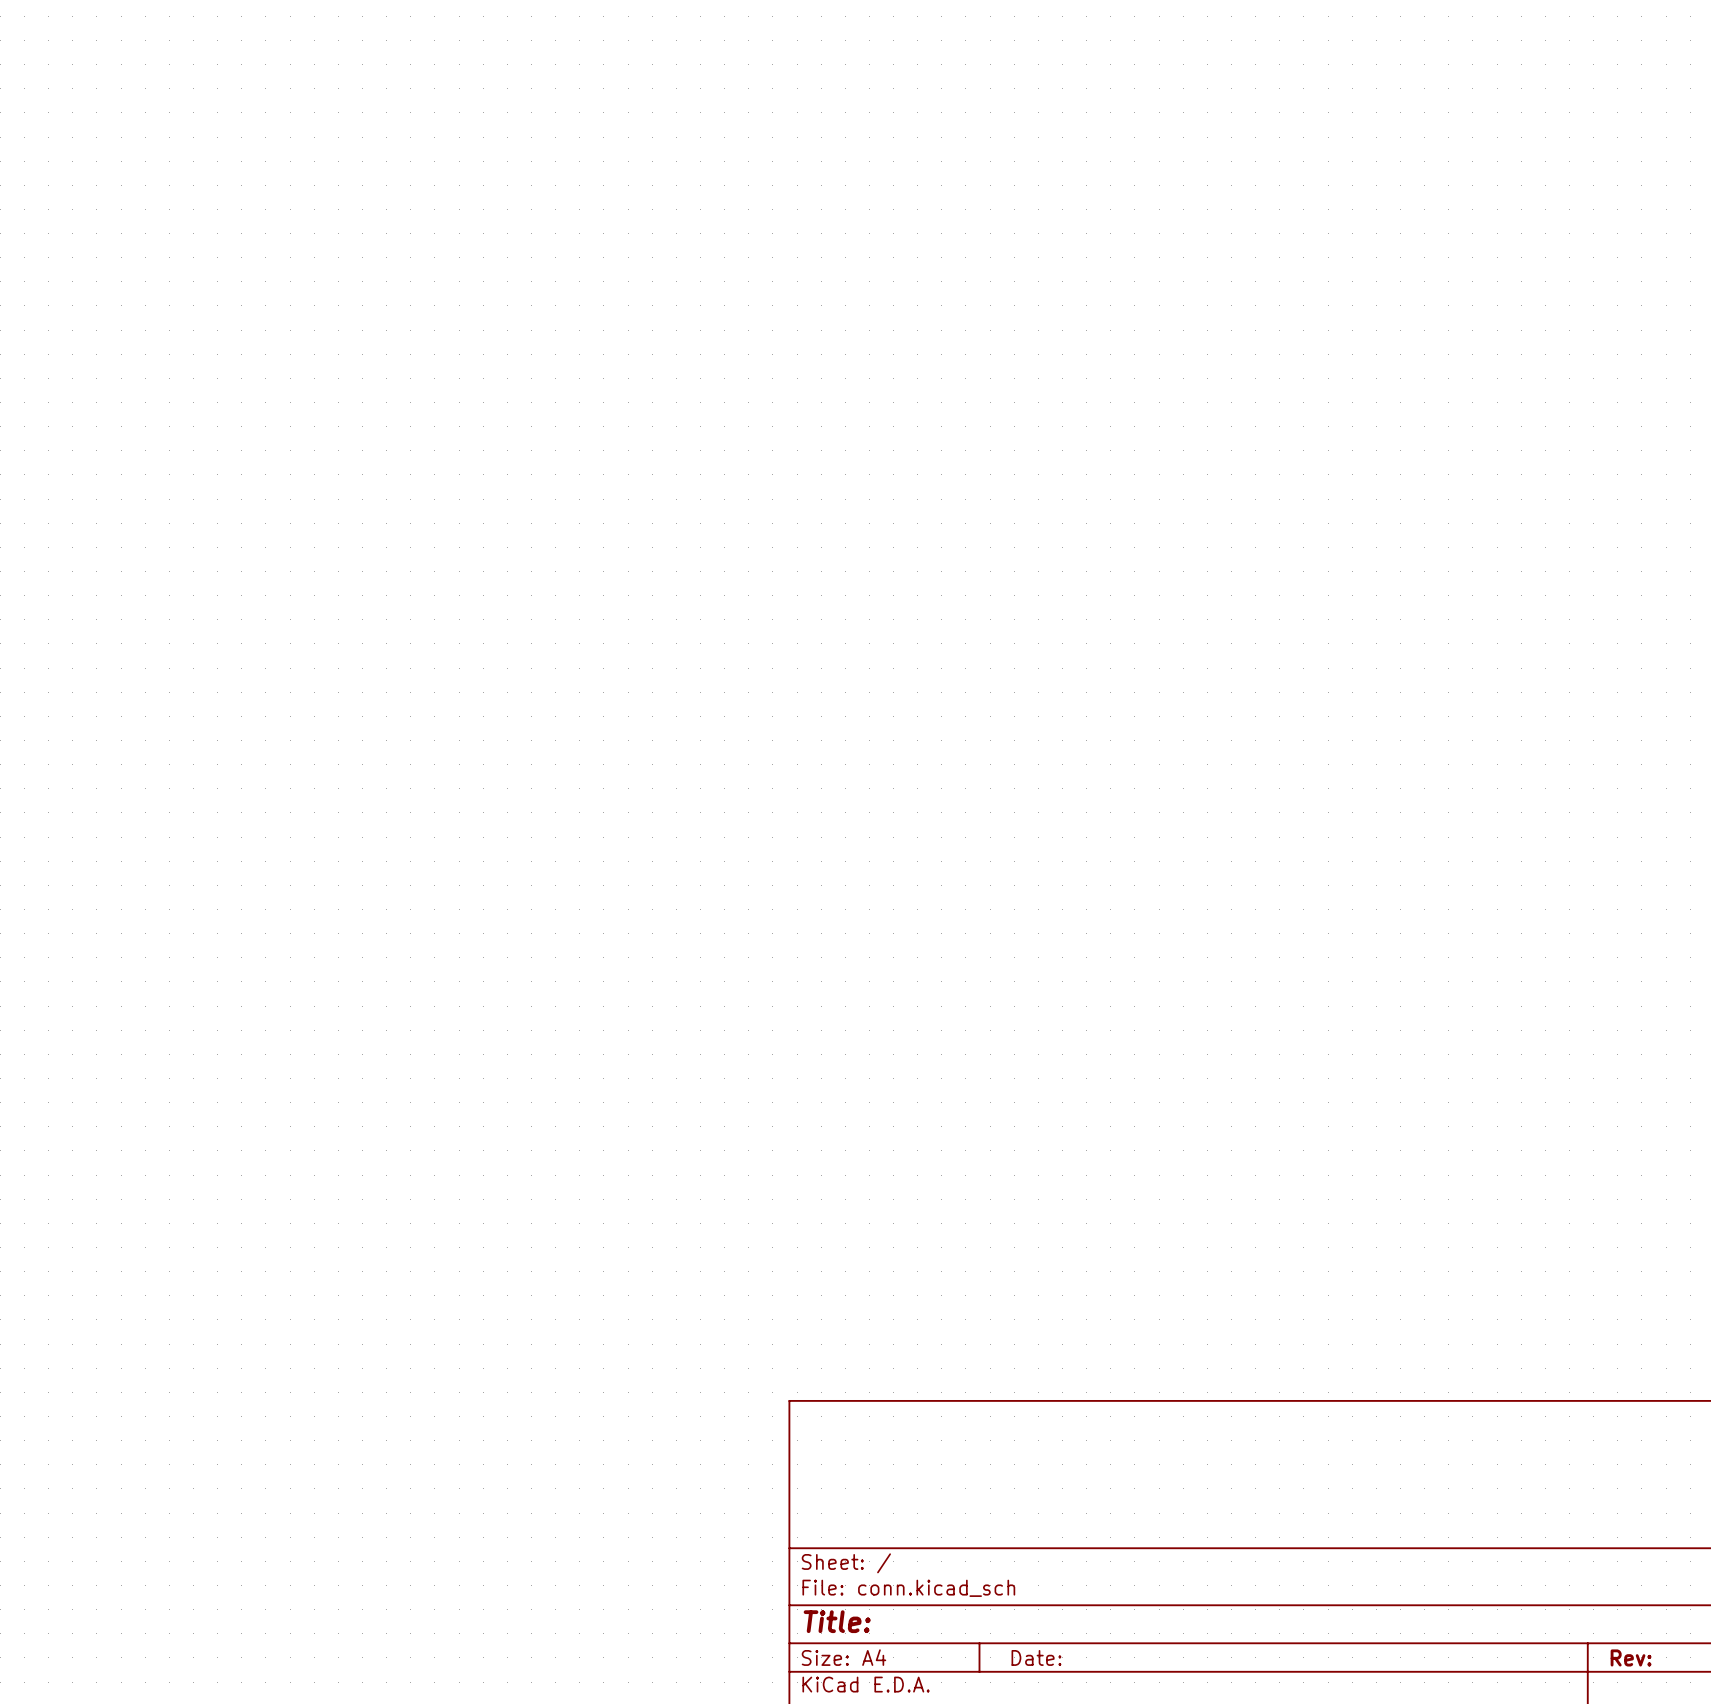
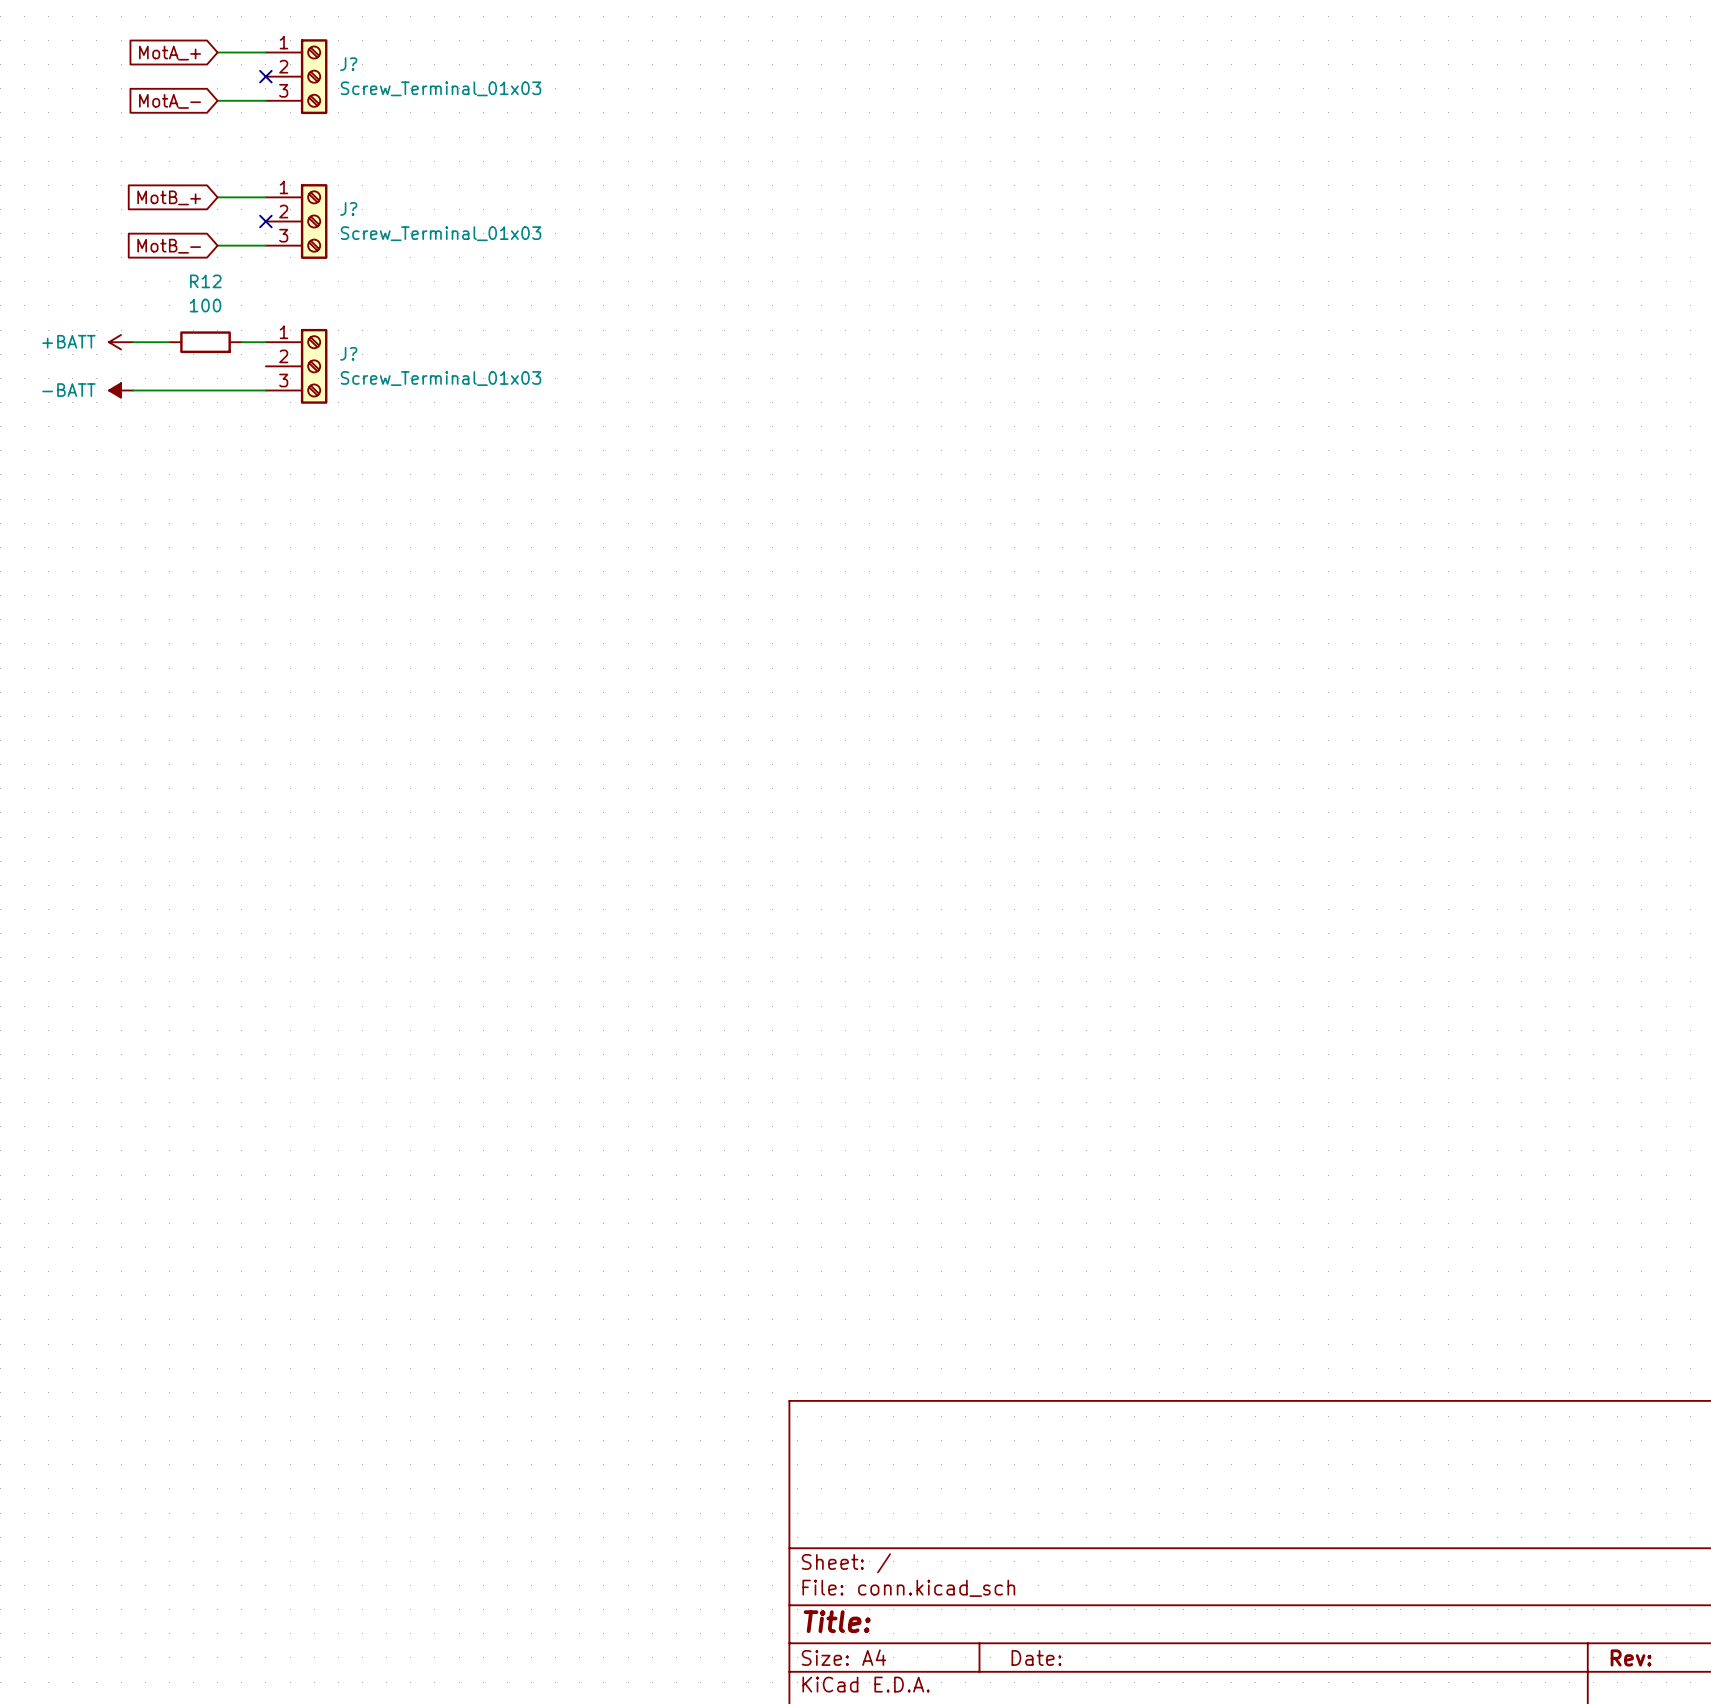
wire: none -> (217, 52) (265, 52)
global label: none -> MotA_+ (170, 53)
no-connect mark: none -> (265, 76)
J?: none -> Screw_Terminal_01x03 (296, 76)
wire: none -> (217, 100) (265, 100)
global label: none -> MotA_- (170, 101)
global label: none -> MotB_+ (169, 197)
wire: none -> (217, 197) (265, 197)
no-connect mark: none -> (265, 221)
J?: none -> Screw_Terminal_01x03 (296, 221)
wire: none -> (217, 245) (265, 245)
global label: none -> MotB_- (169, 246)
power symbol: none -> +BATT (121, 342)
wire: none -> (133, 342) (169, 342)
R12: none -> 100 (205, 342)
wire: none -> (241, 342) (265, 342)
J?: none -> Screw_Terminal_01x03 (296, 366)
power symbol: none -> -BATT (121, 390)
wire: none -> (133, 390) (265, 390)

